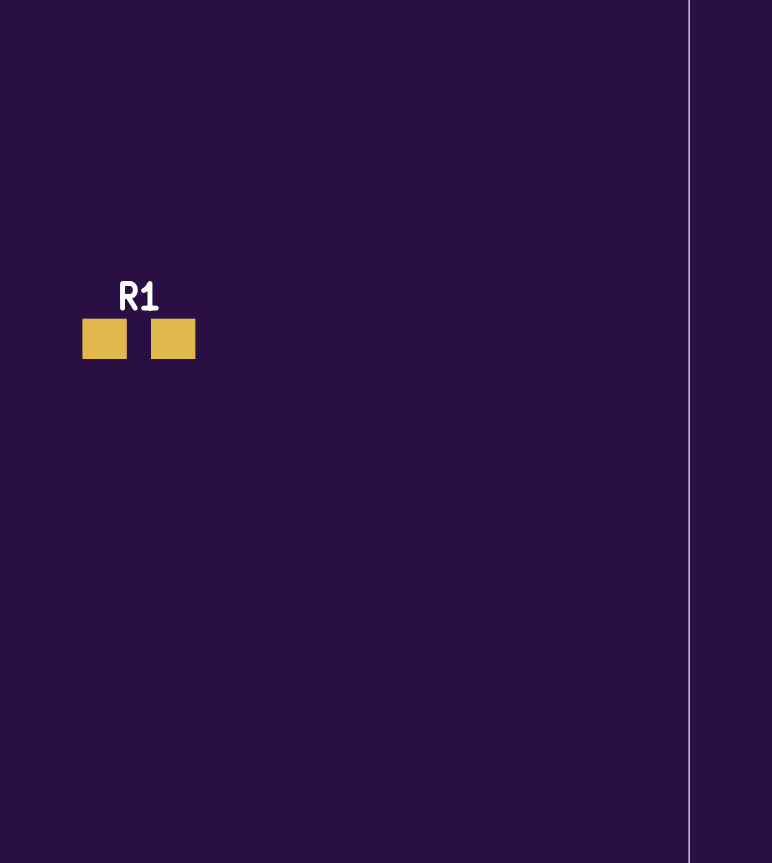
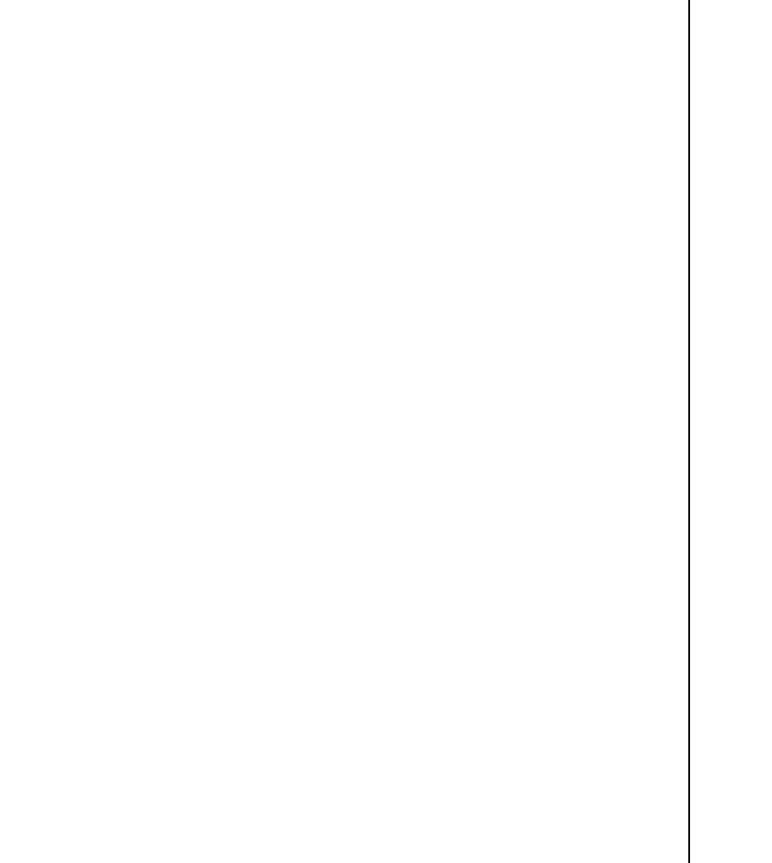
R1: (138, 338) -> none

